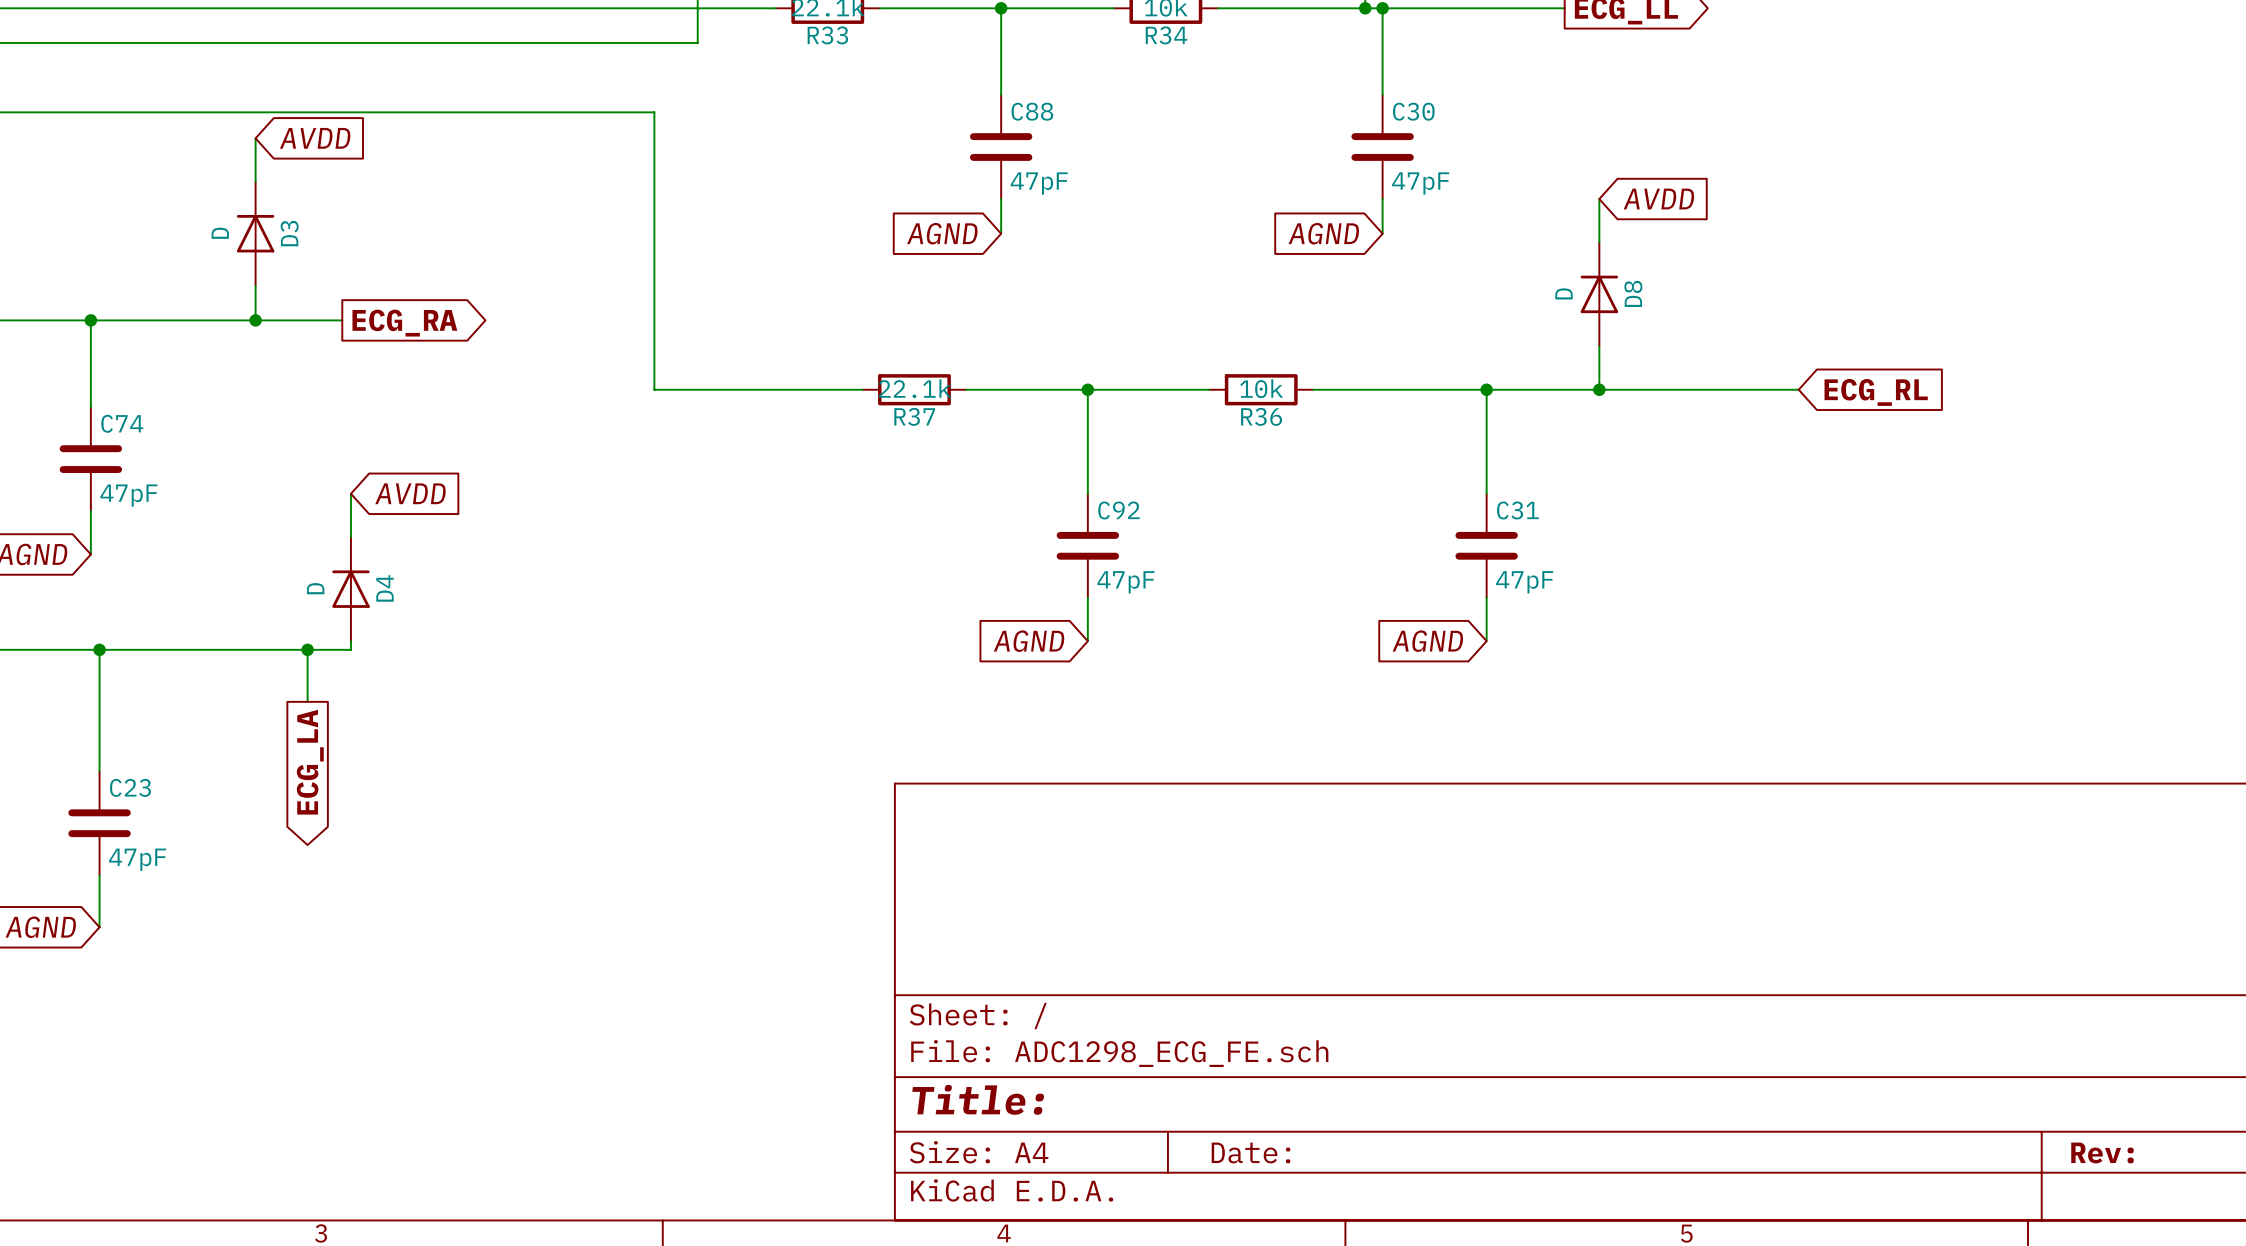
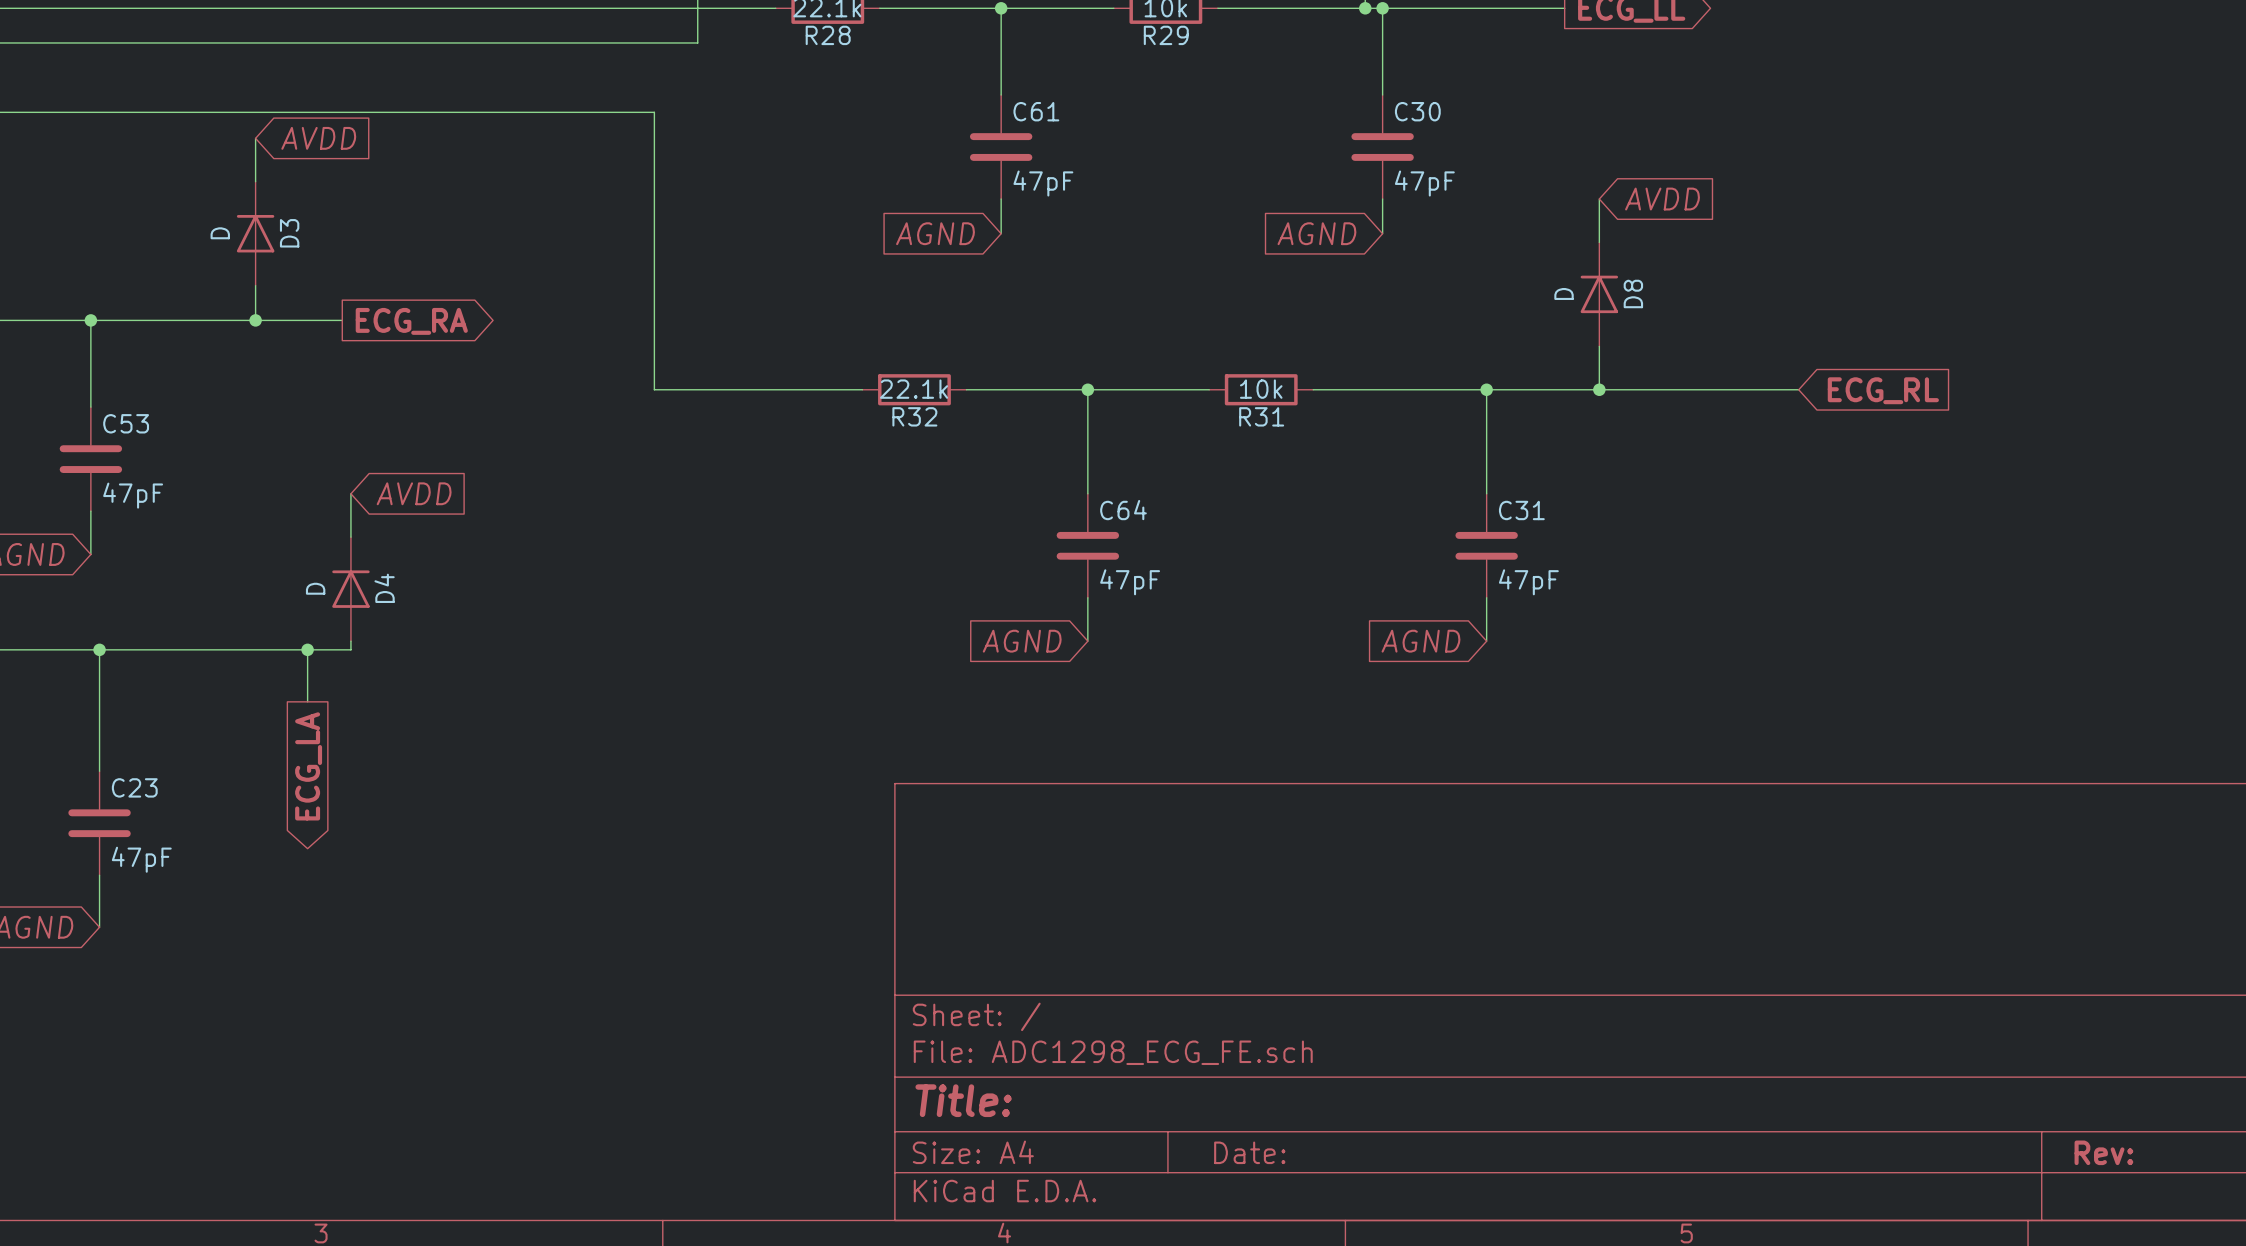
R33 name: R33 (827, 35) -> R28 (828, 35)
R34 name: R34 (1166, 35) -> R29 (1166, 35)
C88 name: C88 (1032, 111) -> C61 (1036, 111)
R37 name: R37 (914, 416) -> R32 (914, 416)
R36 name: R36 (1261, 416) -> R31 (1261, 416)
C74 name: C74 (122, 423) -> C53 (126, 423)
C92 name: C92 (1118, 510) -> C64 (1123, 510)

